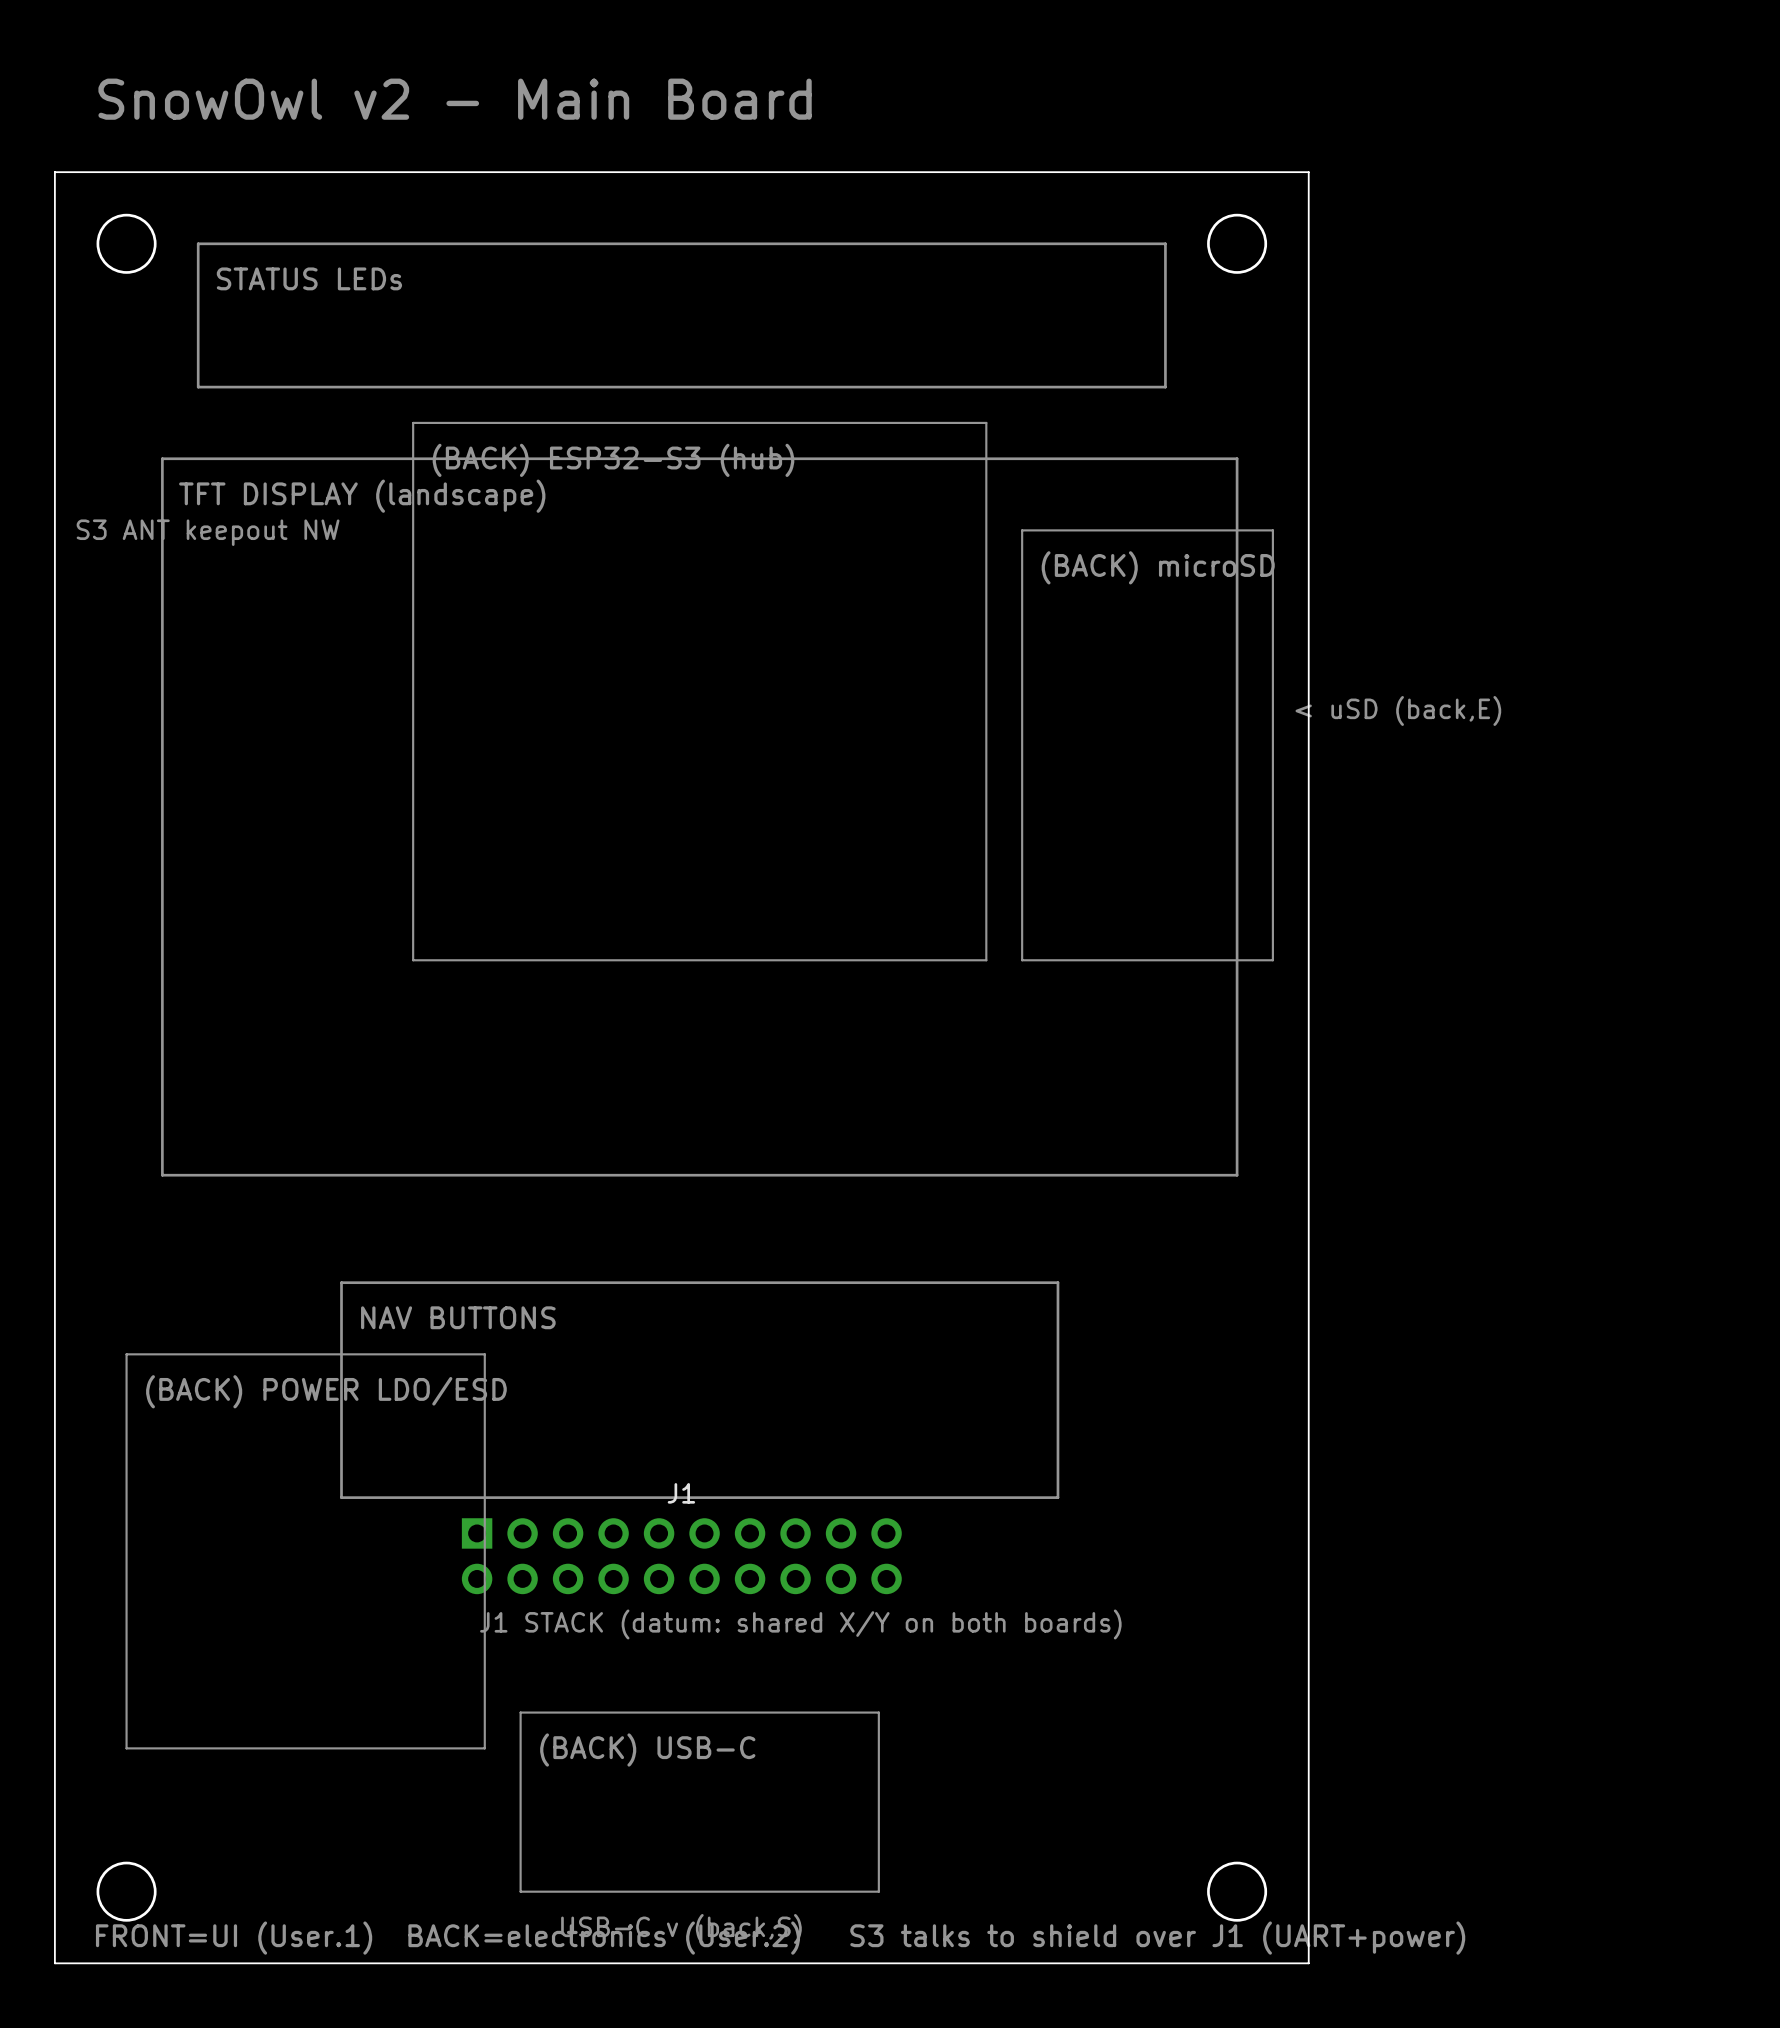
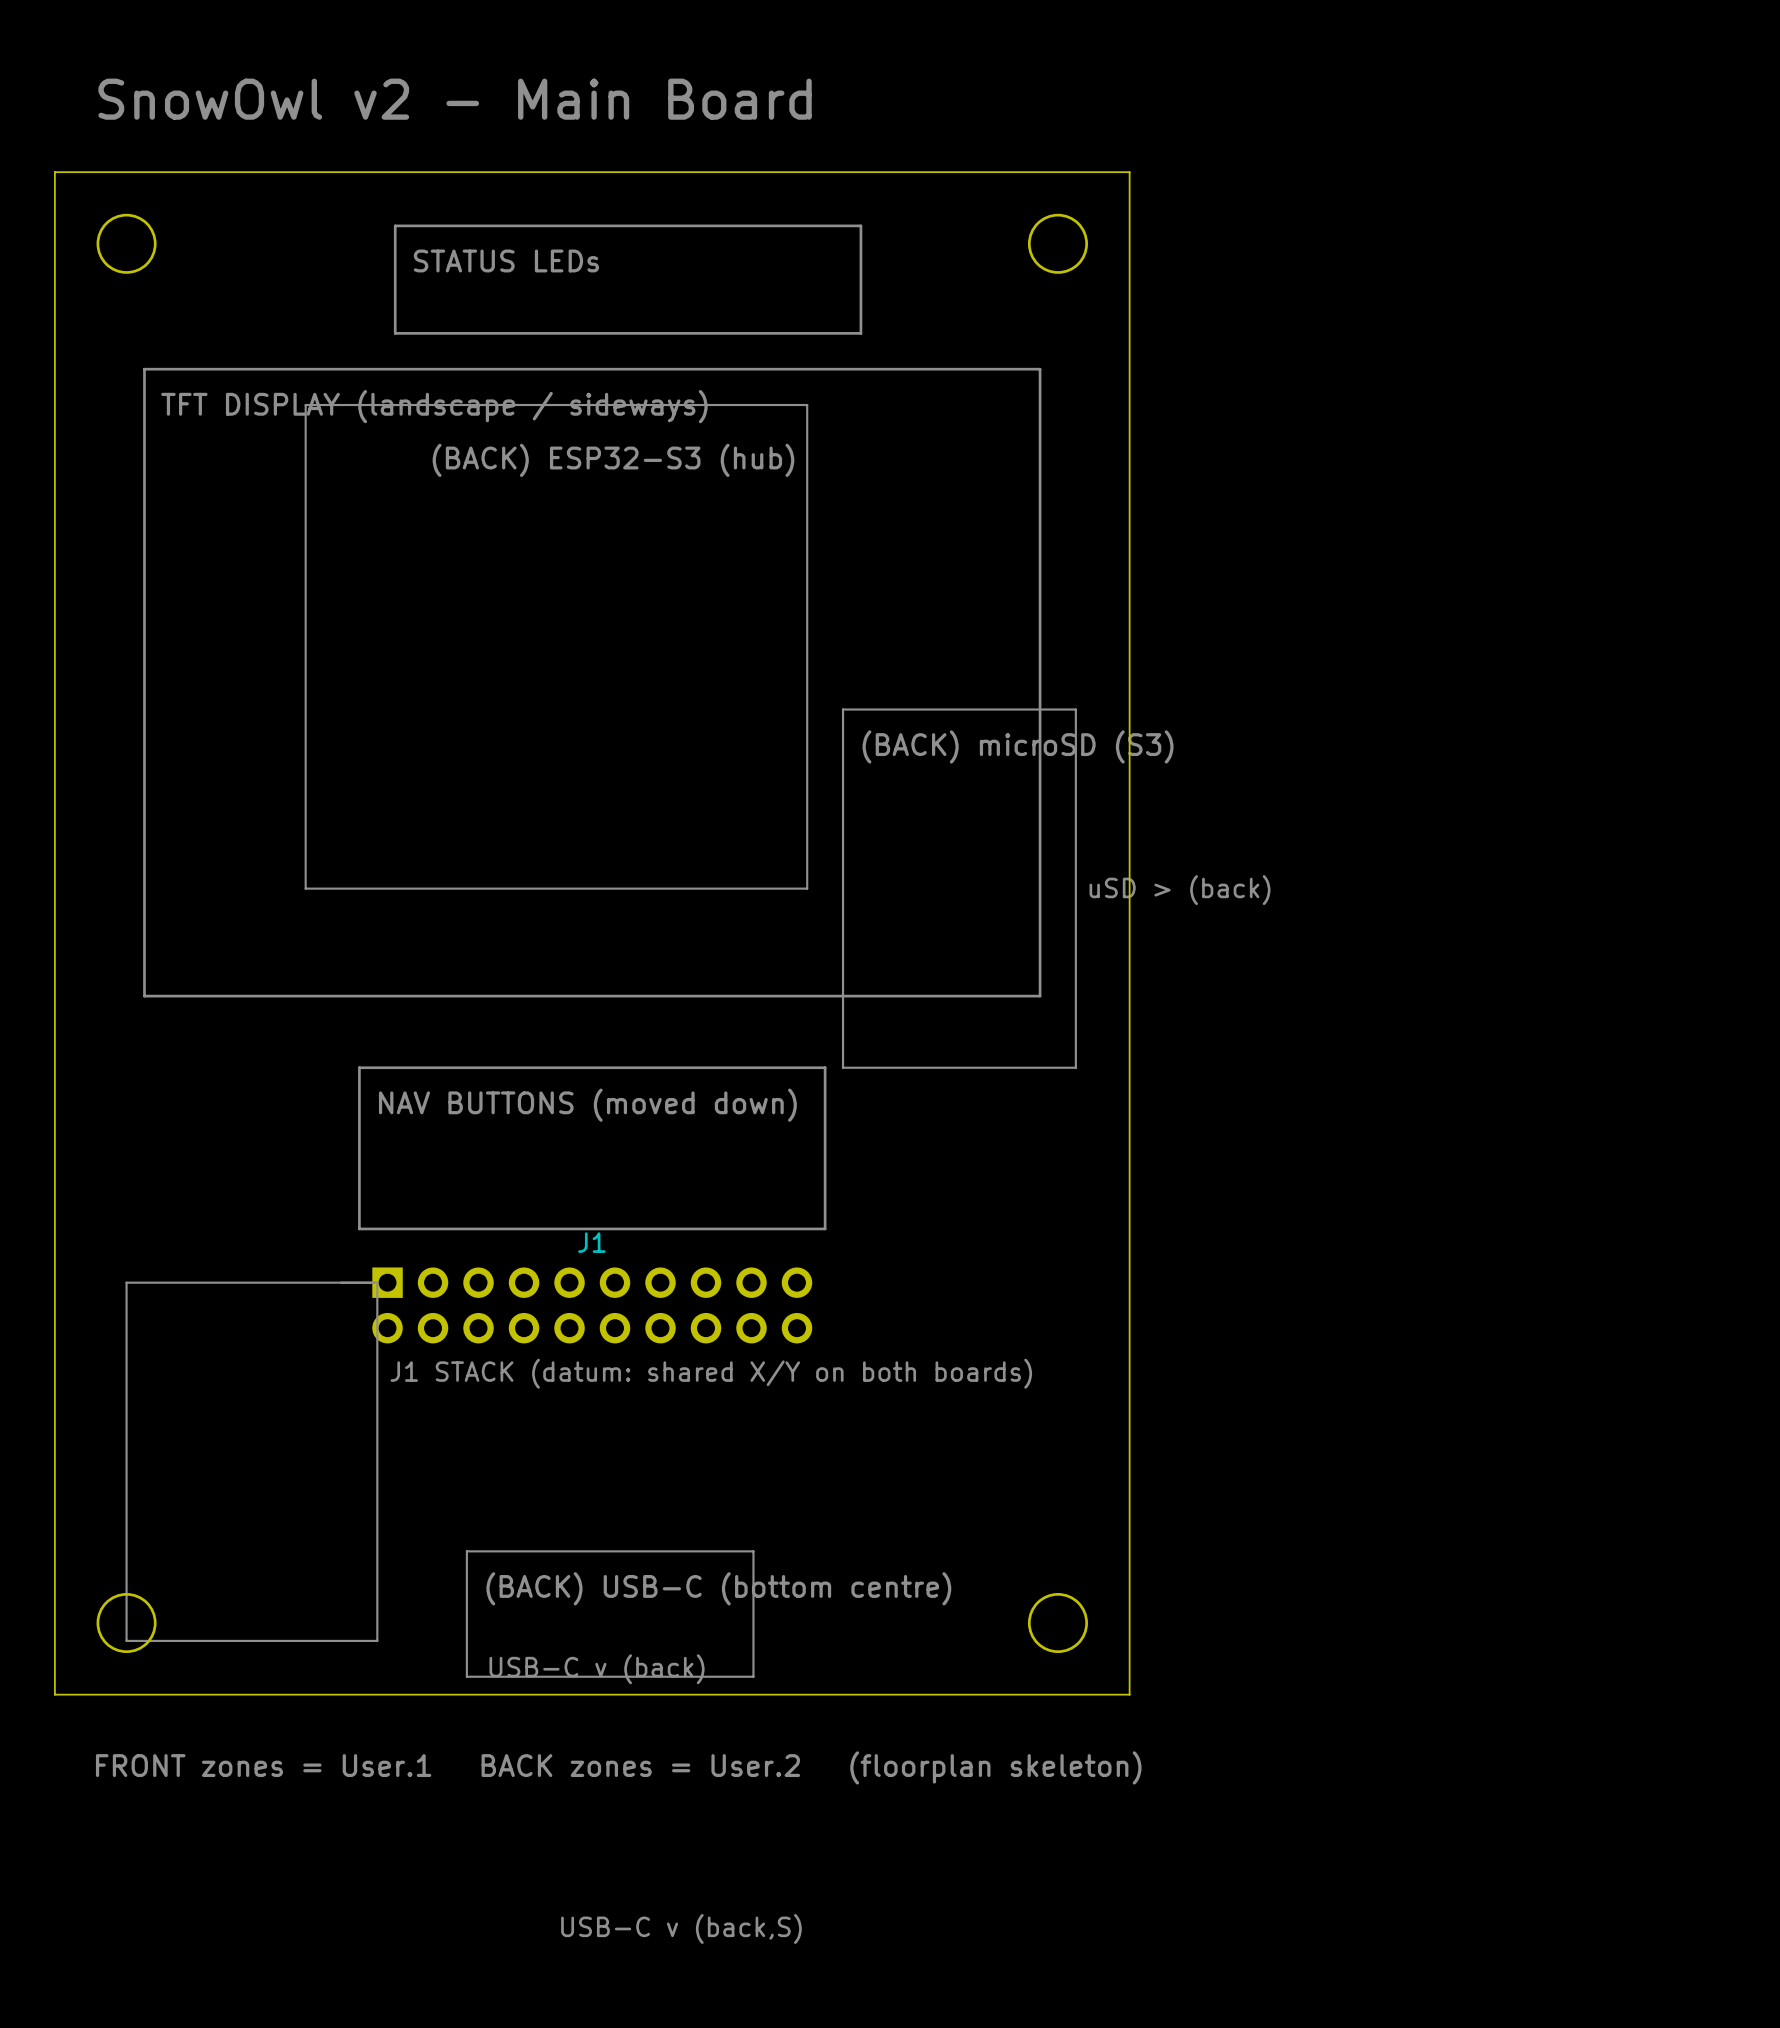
board edge: (1129, 172) (1308, 172) (1308, 1963) (54, 1963) (54, 1694) -> (1129, 172) (1129, 1694) (54, 1694)
line: none -> (395, 225) (860, 225) (860, 333) (395, 333) (395, 225)
line: (198, 243) (1165, 243) (1165, 387) (198, 387) (198, 243) -> none
round board edge position: (1237, 243) -> (1057, 243)
text position: STATUS LEDs (309, 278) -> STATUS LEDs (506, 260)
text: none -> TFT DISPLAY (landscape / sideways) (434, 406)
line: (413, 422) (986, 422) (986, 960) (413, 960) (413, 422) -> (305, 405) (305, 888) (807, 888) (807, 405) (305, 405)
line: (162, 458) (1237, 458) (1237, 1175) (162, 1175) (162, 458) -> (144, 369) (144, 996) (1040, 996) (1040, 369) (144, 369)
text: TFT DISPLAY (landscape) (362, 496) -> none
line: (1022, 530) (1272, 530) (1272, 960) (1022, 960) (1022, 530) -> none
text: S3 ANT keepout NW (208, 532) -> none
text: (BACK) microSD (1158, 567) -> none
line: none -> (843, 709) (1075, 709) (1075, 1067) (843, 1067) (843, 709)
text: < uSD (back,E) (1398, 710) -> none
text: none -> (BACK) microSD (S3) (1018, 746)
text: none -> uSD > (back) (1180, 890)
line: none -> (359, 1067) (825, 1067) (825, 1228) (359, 1228) (359, 1067)
text: none -> NAV BUTTONS (moved down) (587, 1105)
line: (341, 1282) (341, 1497) (1057, 1497) (1057, 1282) (377, 1282) -> (341, 1282) (126, 1282) (126, 1354)
text: NAV BUTTONS (458, 1317) -> none
line: (126, 1354) (484, 1354) (484, 1748) (126, 1748) (126, 1640) -> (377, 1282) (377, 1640) (126, 1640)
text: (BACK) POWER LDO/ESD (326, 1391) -> none
line: none -> (466, 1551) (753, 1551) (753, 1676) (466, 1676) (466, 1551)
J1 position: (681, 1556) -> (592, 1305)
text: none -> (BACK) USB-C (bottom centre) (718, 1588)
text position: J1 STACK (datum: shared X/Y on both boards) (800, 1624) -> J1 STACK (datum: shared X/Y on both boards) (711, 1373)
text: none -> USB-C v (back) (597, 1669)
line: (520, 1712) (878, 1712) (878, 1891) (520, 1891) (520, 1712) -> none
text: (BACK) USB-C (647, 1750) -> none
text: none -> FRONT zones = User.1 BACK zones = User.2 (floorplan skeleton) (618, 1767)
round board edge position: (126, 1891) -> (126, 1623)
round board edge position: (1237, 1891) -> (1057, 1623)
text: FRONT=UI (User.1) BACK=electronics (User.2) S3 talks to shield over J1 (UART+power) (780, 1938) -> none

